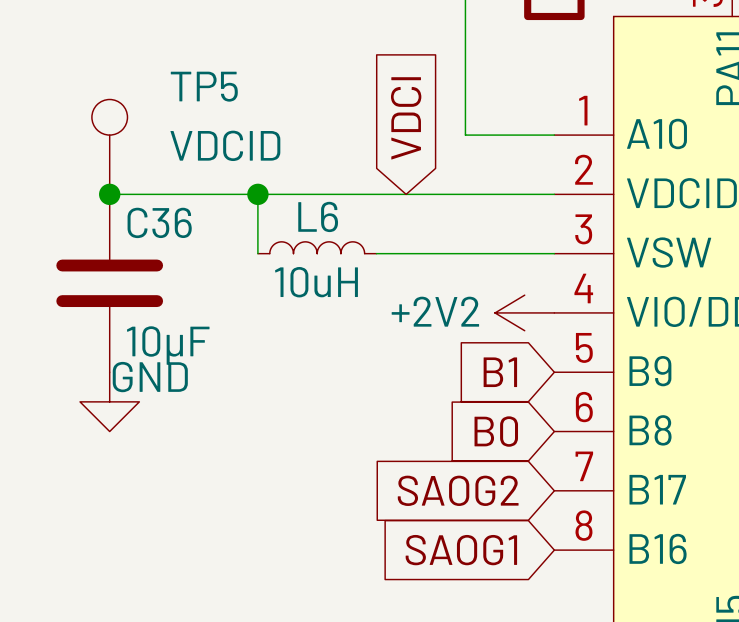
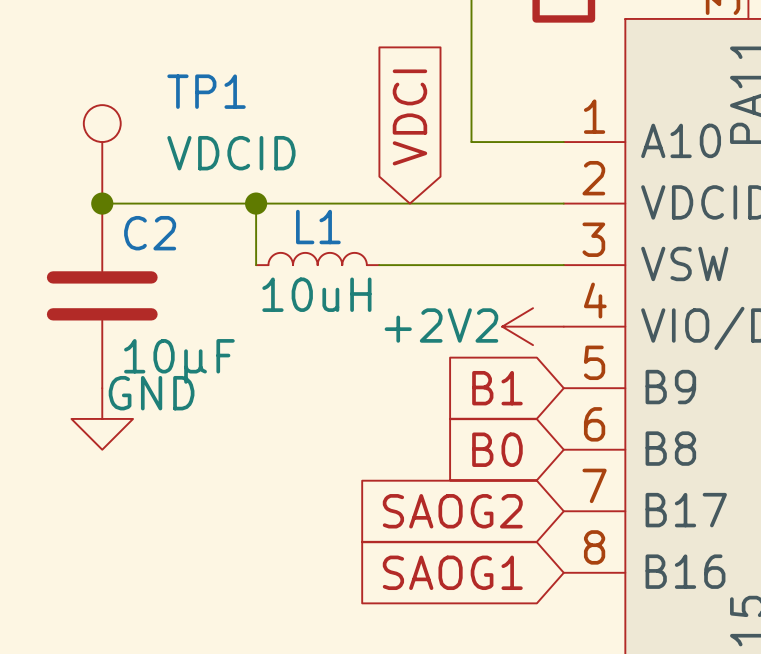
TP5 name: TP5 (204, 86) -> TP1 (206, 91)
L6 name: L6 (318, 216) -> L1 (318, 227)
C36 name: C36 (159, 222) -> C2 (150, 233)

